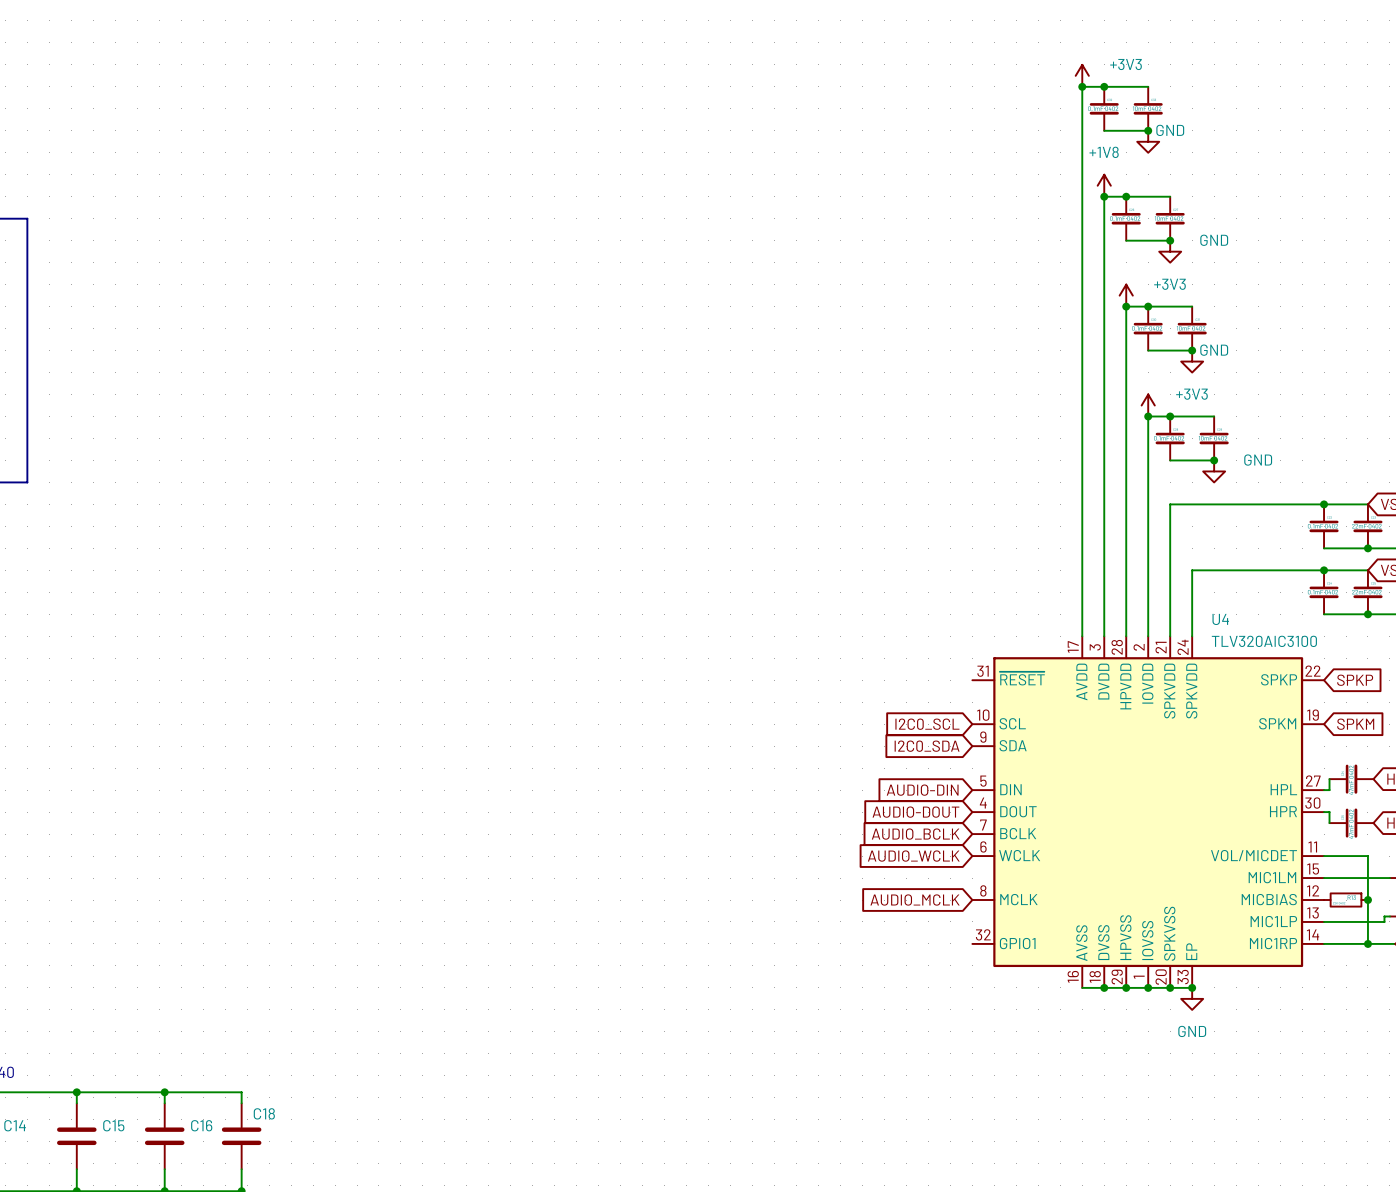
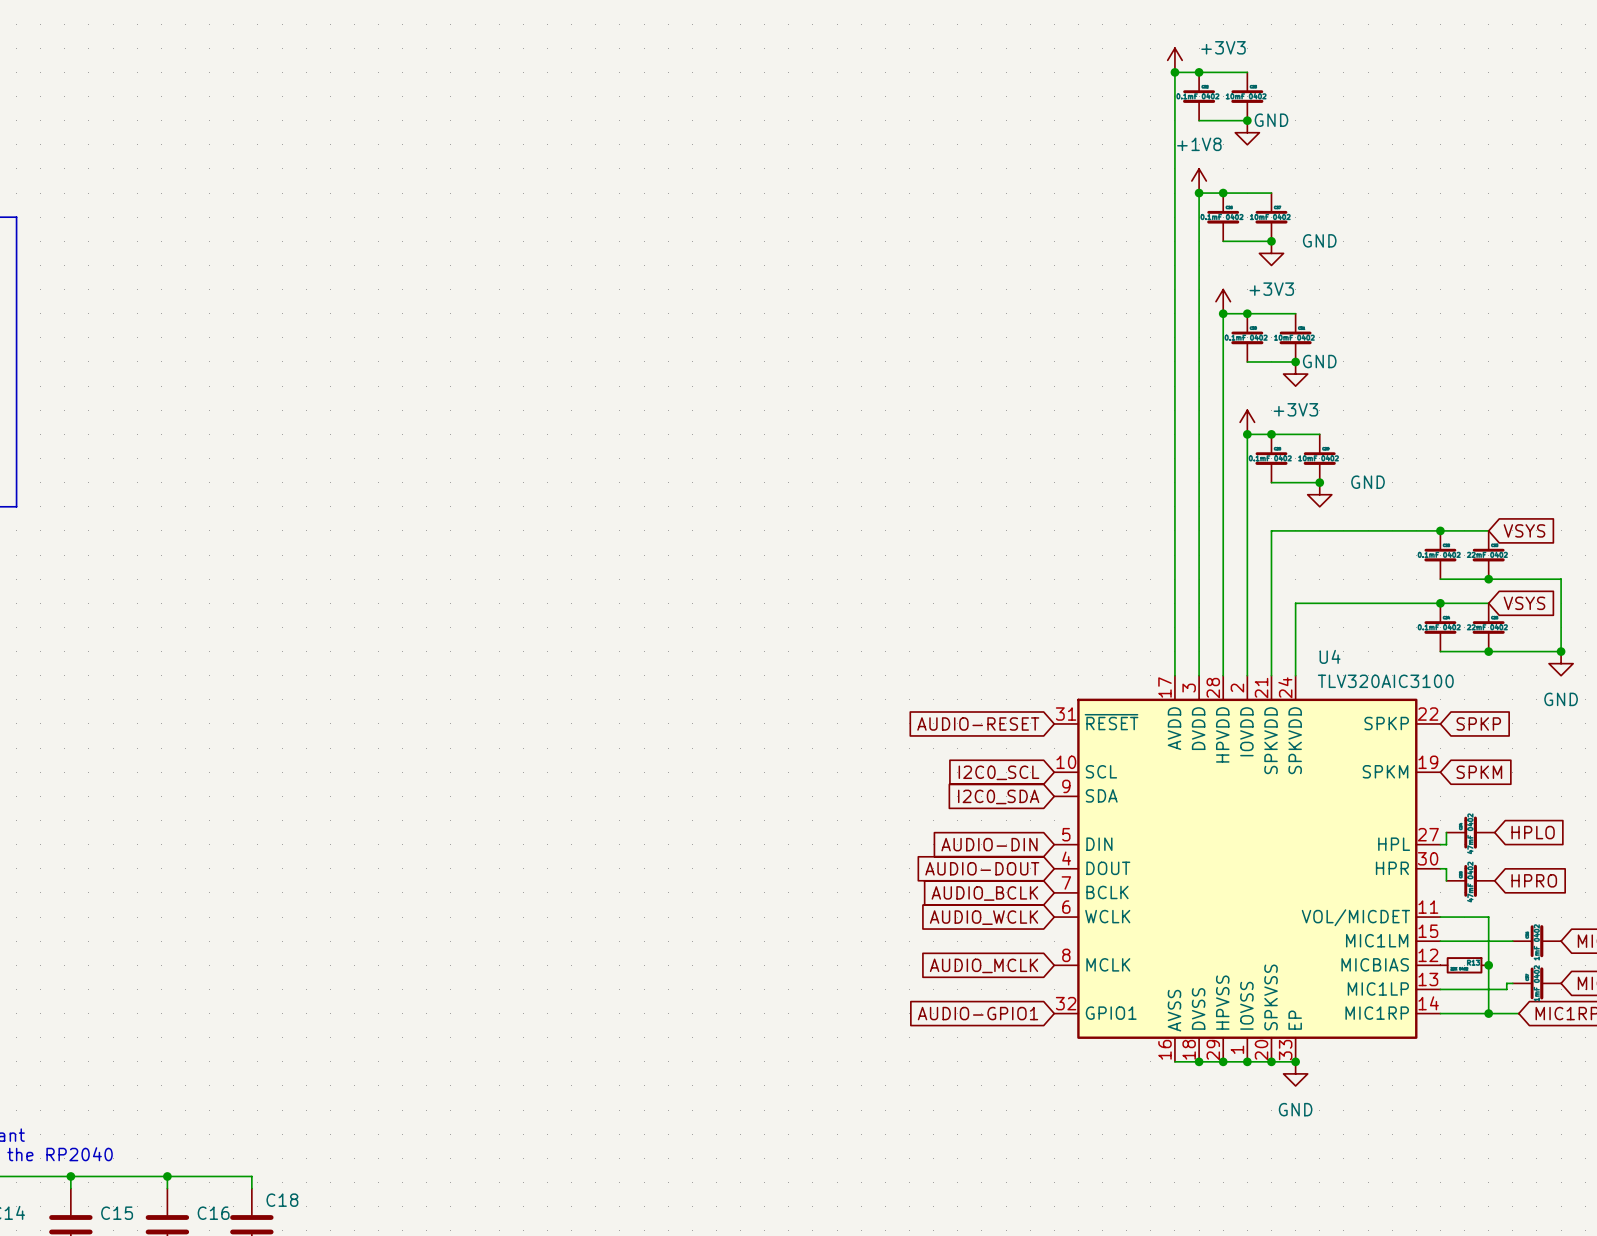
global label: none -> AUDIO-RESET (978, 723)
global label: none -> AUDIO-GPIO1 (977, 1013)

